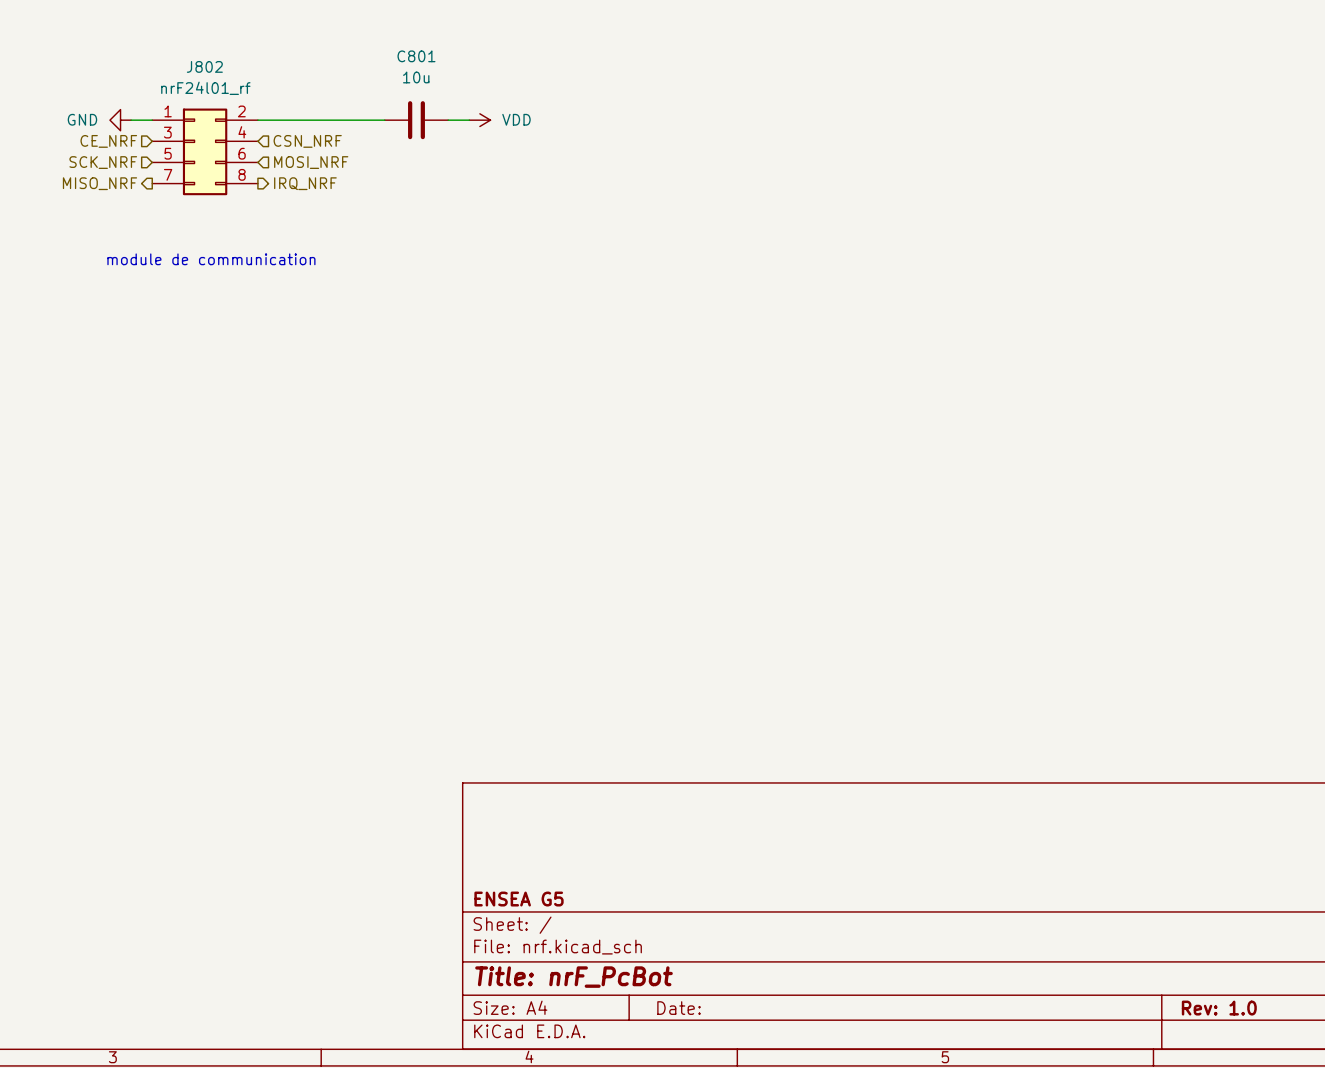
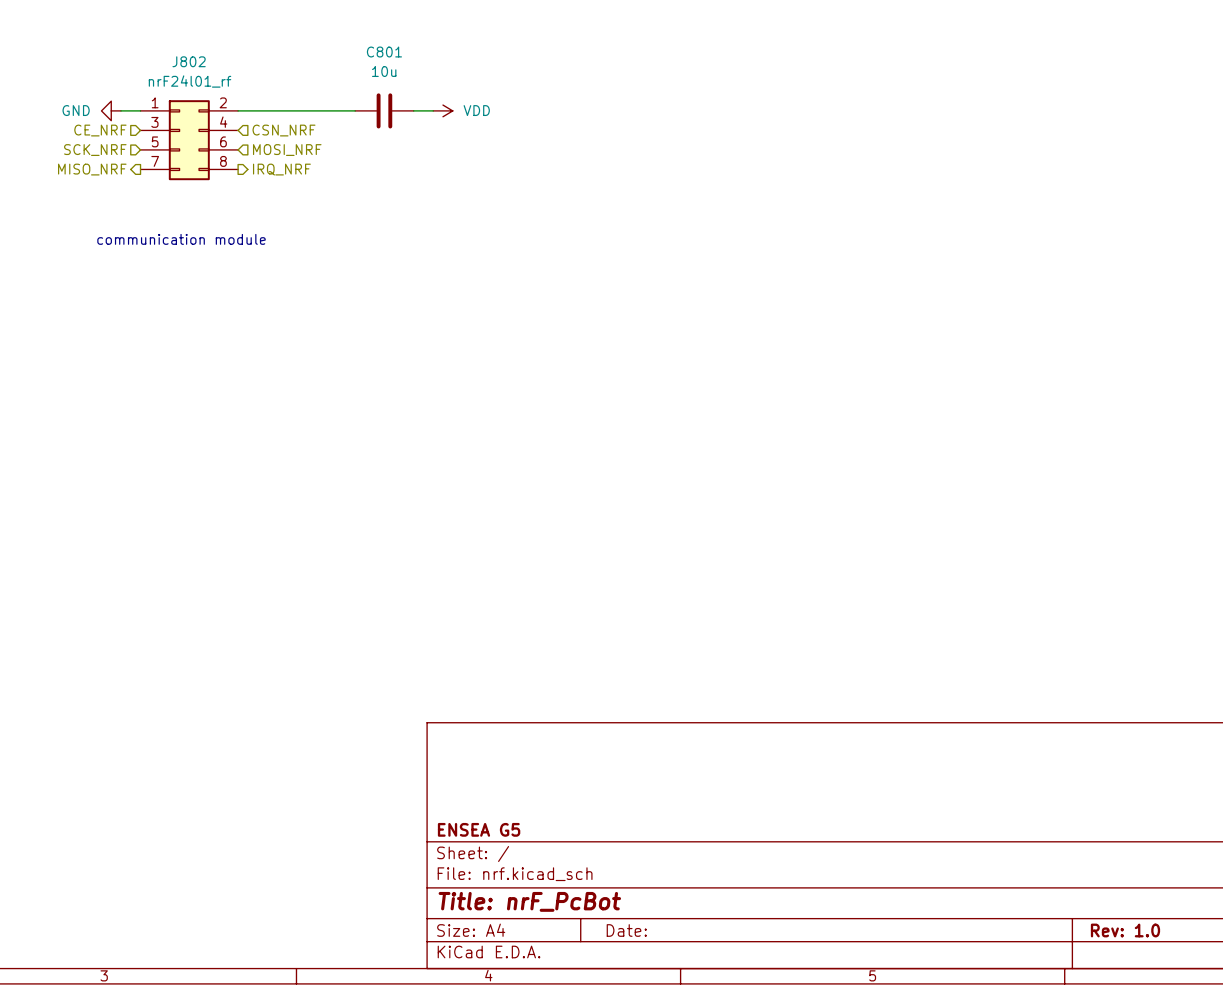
text: module de communication (211, 259) -> communication module (181, 239)

